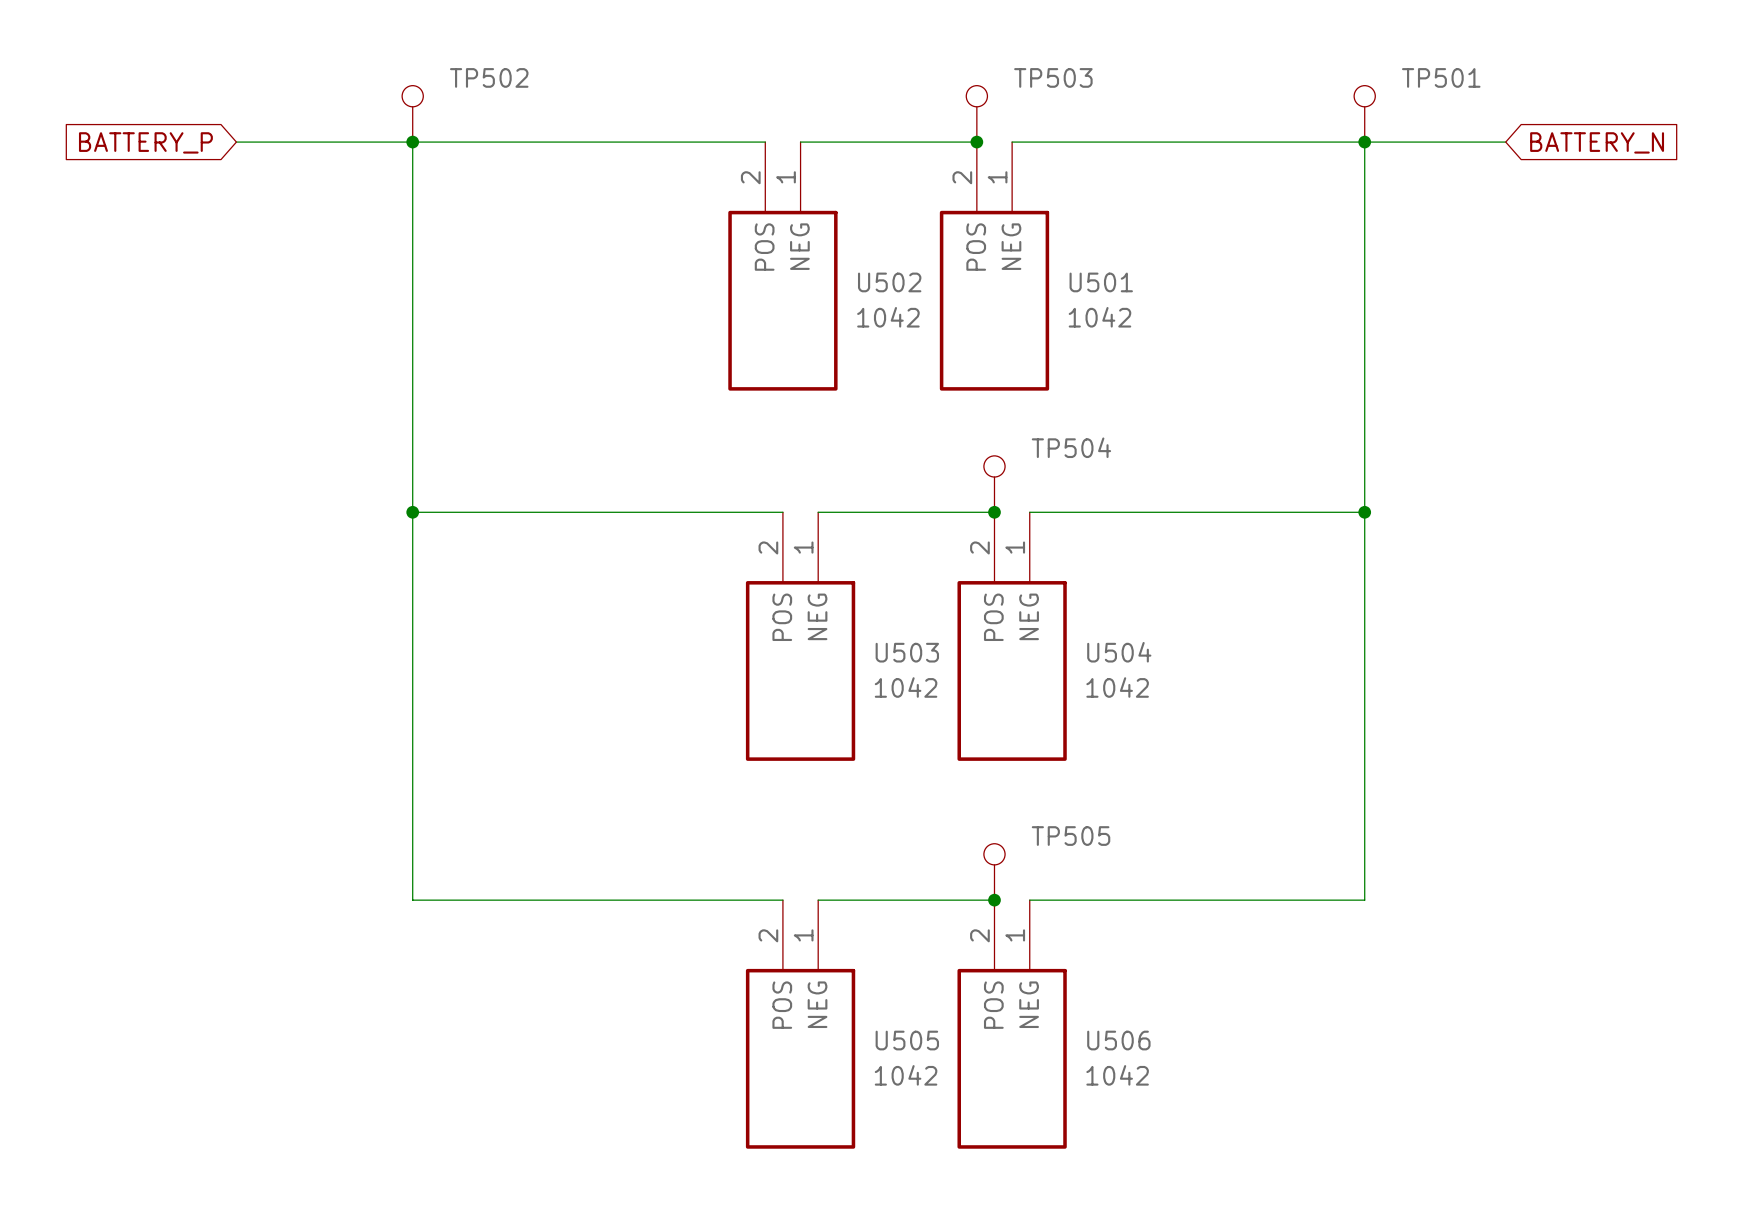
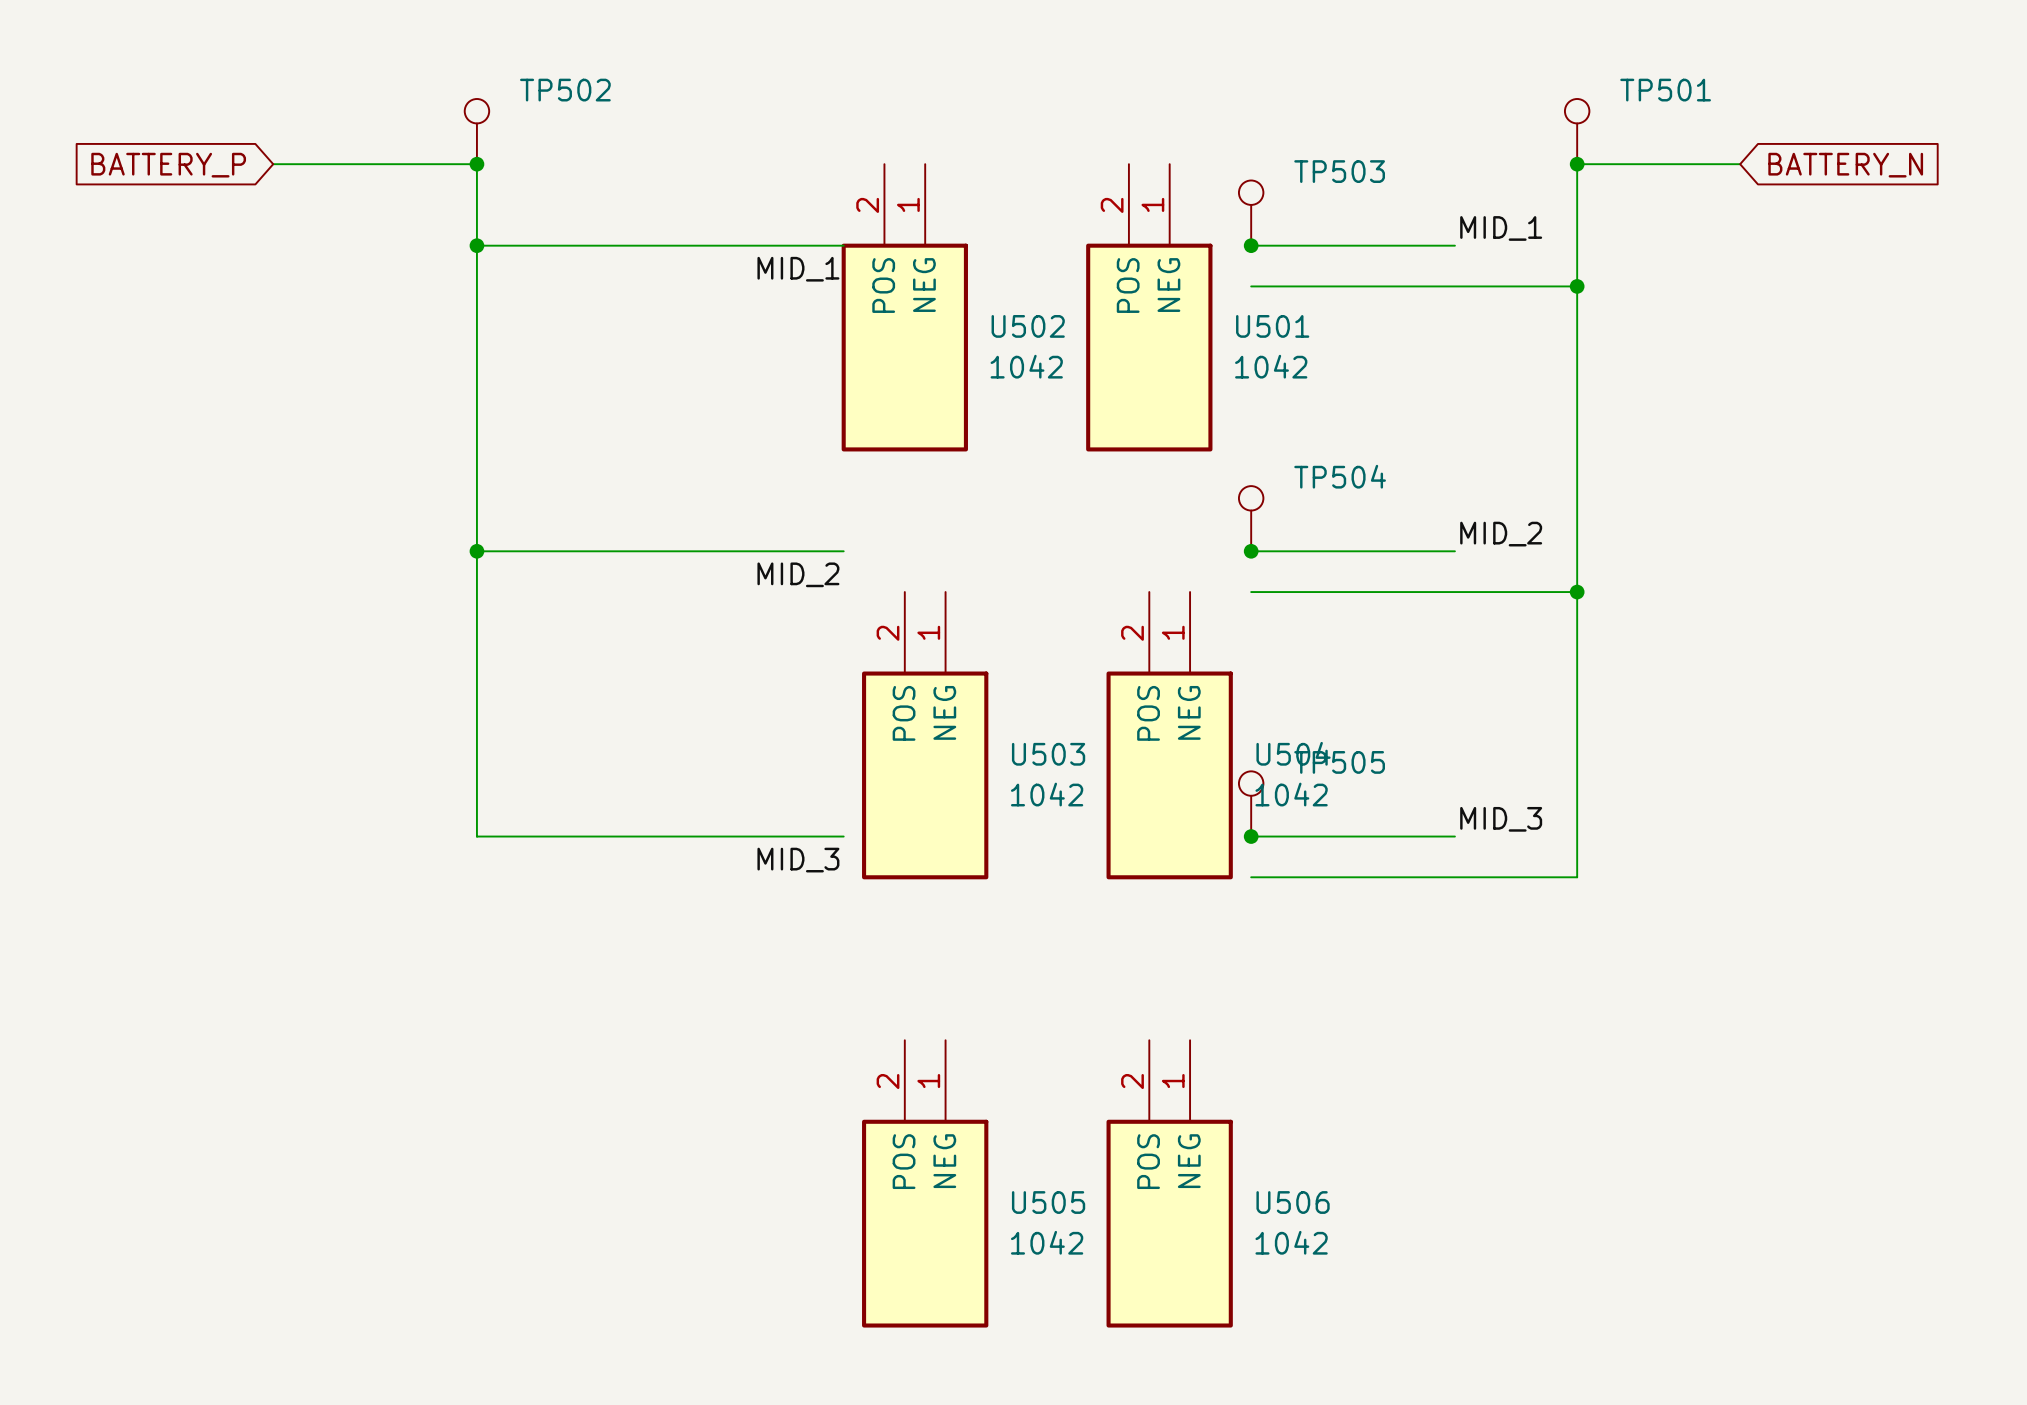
TP503 position: (976, 113) -> (1251, 213)
wire: (412, 142) (765, 142) -> none
wire: (800, 142) (976, 142) -> (1251, 245) (1454, 245)
junction: (976, 142) -> none
wire: (1012, 142) (1364, 142) -> none
label: none -> MID_1 (1501, 228)
wire: none -> (476, 245) (843, 245)
junction: none -> (476, 245)
junction: none -> (1251, 245)
label: none -> MID_1 (798, 269)
wire: none -> (1251, 286) (1577, 286)
junction: none -> (1577, 286)
label: none -> MID_2 (1501, 534)
wire: none -> (476, 551) (843, 551)
junction: none -> (1251, 551)
TP504 position: (994, 484) -> (1251, 518)
label: none -> MID_2 (798, 574)
wire: (412, 512) (782, 512) -> none
junction position: (412, 512) -> (476, 551)
wire: (818, 512) (994, 512) -> (1251, 551) (1454, 551)
junction: (994, 512) -> none
wire: (1029, 512) (1082, 512) -> none
label: none -> MID_3 (1501, 819)
wire: (412, 723) (412, 900) (782, 900) -> (476, 836) (843, 836)
junction: none -> (1251, 836)
label: none -> MID_3 (798, 860)
wire: (1364, 759) (1364, 900) (1029, 900) -> (1577, 877) (1251, 877)
TP505 position: (994, 871) -> (1251, 803)
wire: (818, 900) (994, 900) -> (1251, 836) (1454, 836)
junction: (994, 900) -> none

